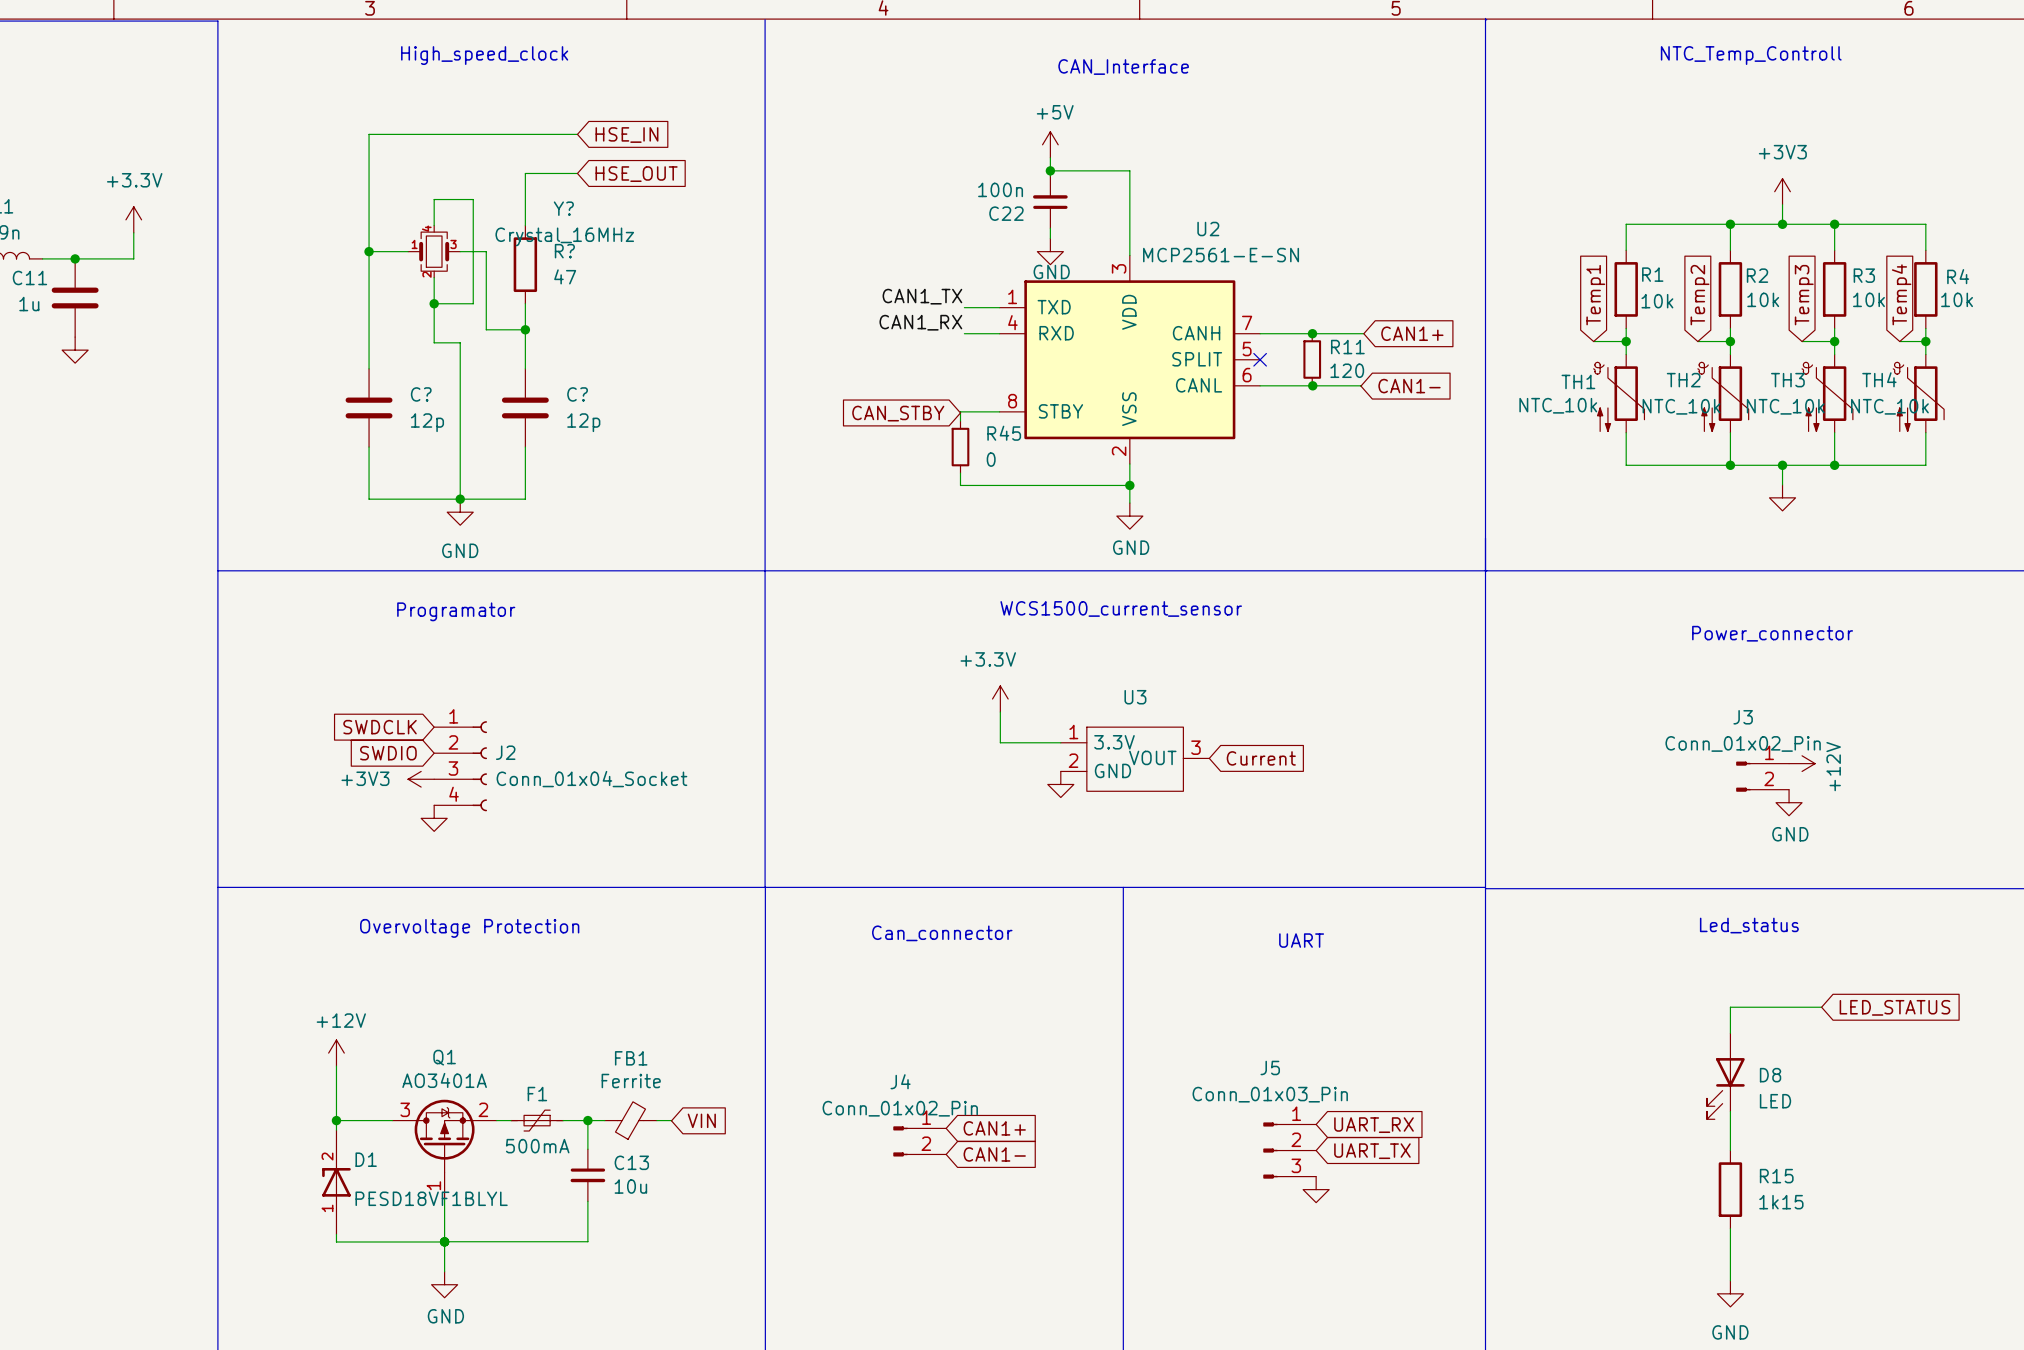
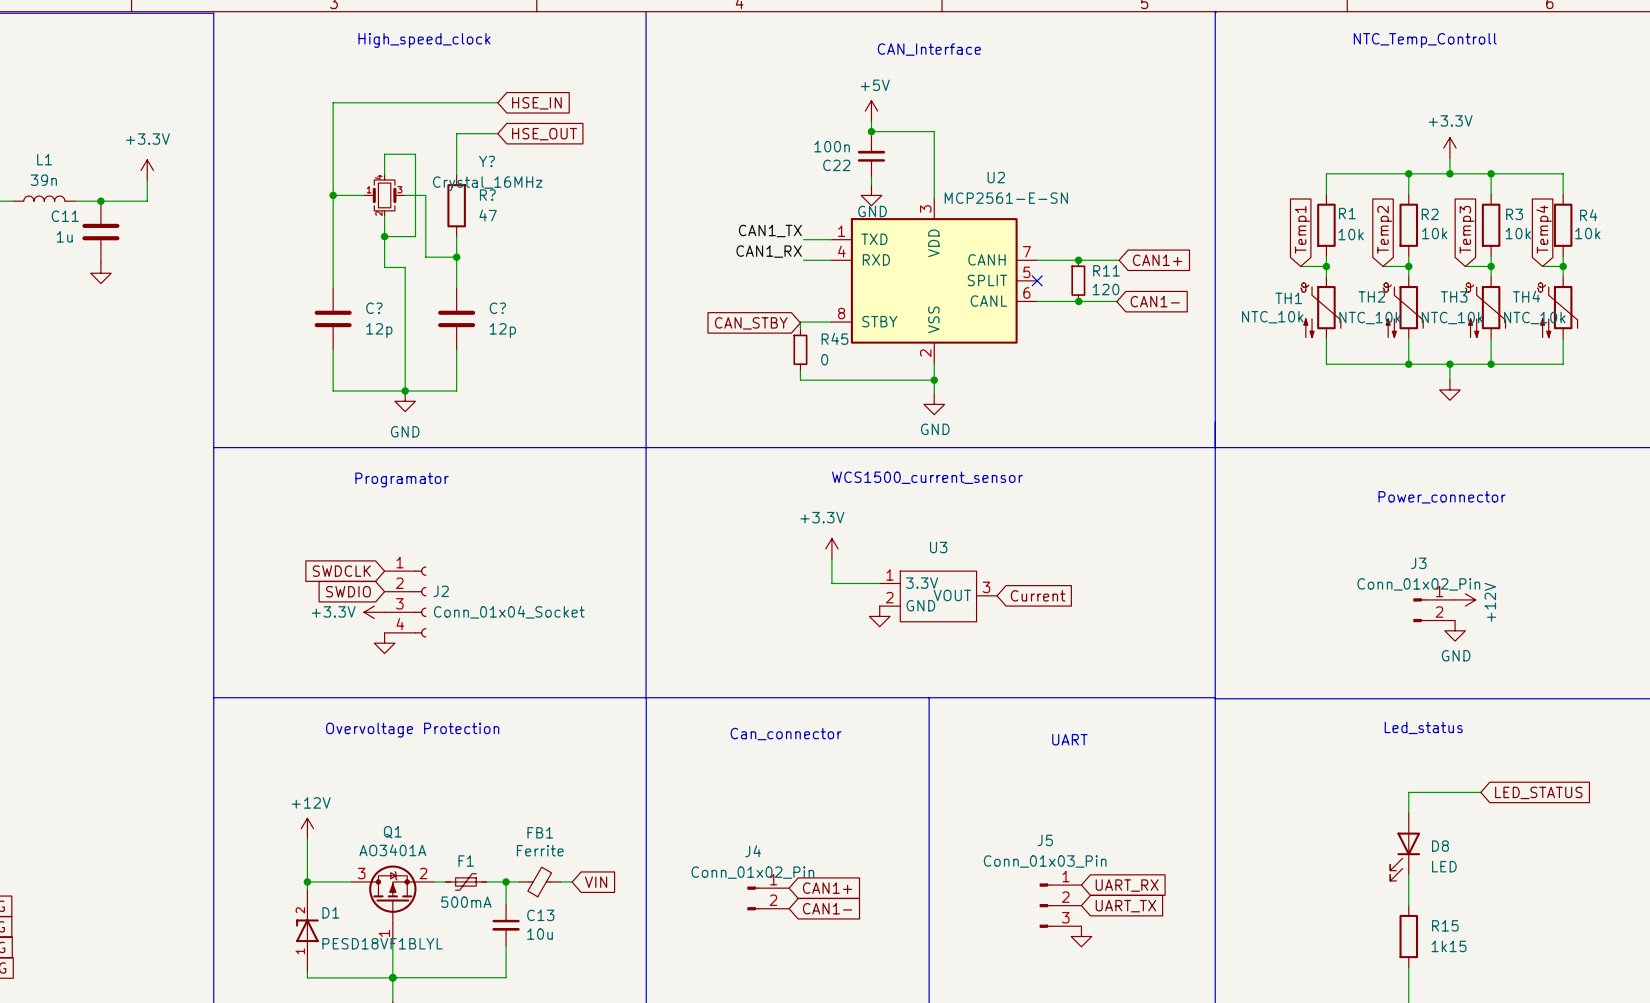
power symbol: +3V3 (1782, 191) -> +3.3V (1449, 148)
power symbol: +3V3 (421, 779) -> +3.3V (374, 612)

